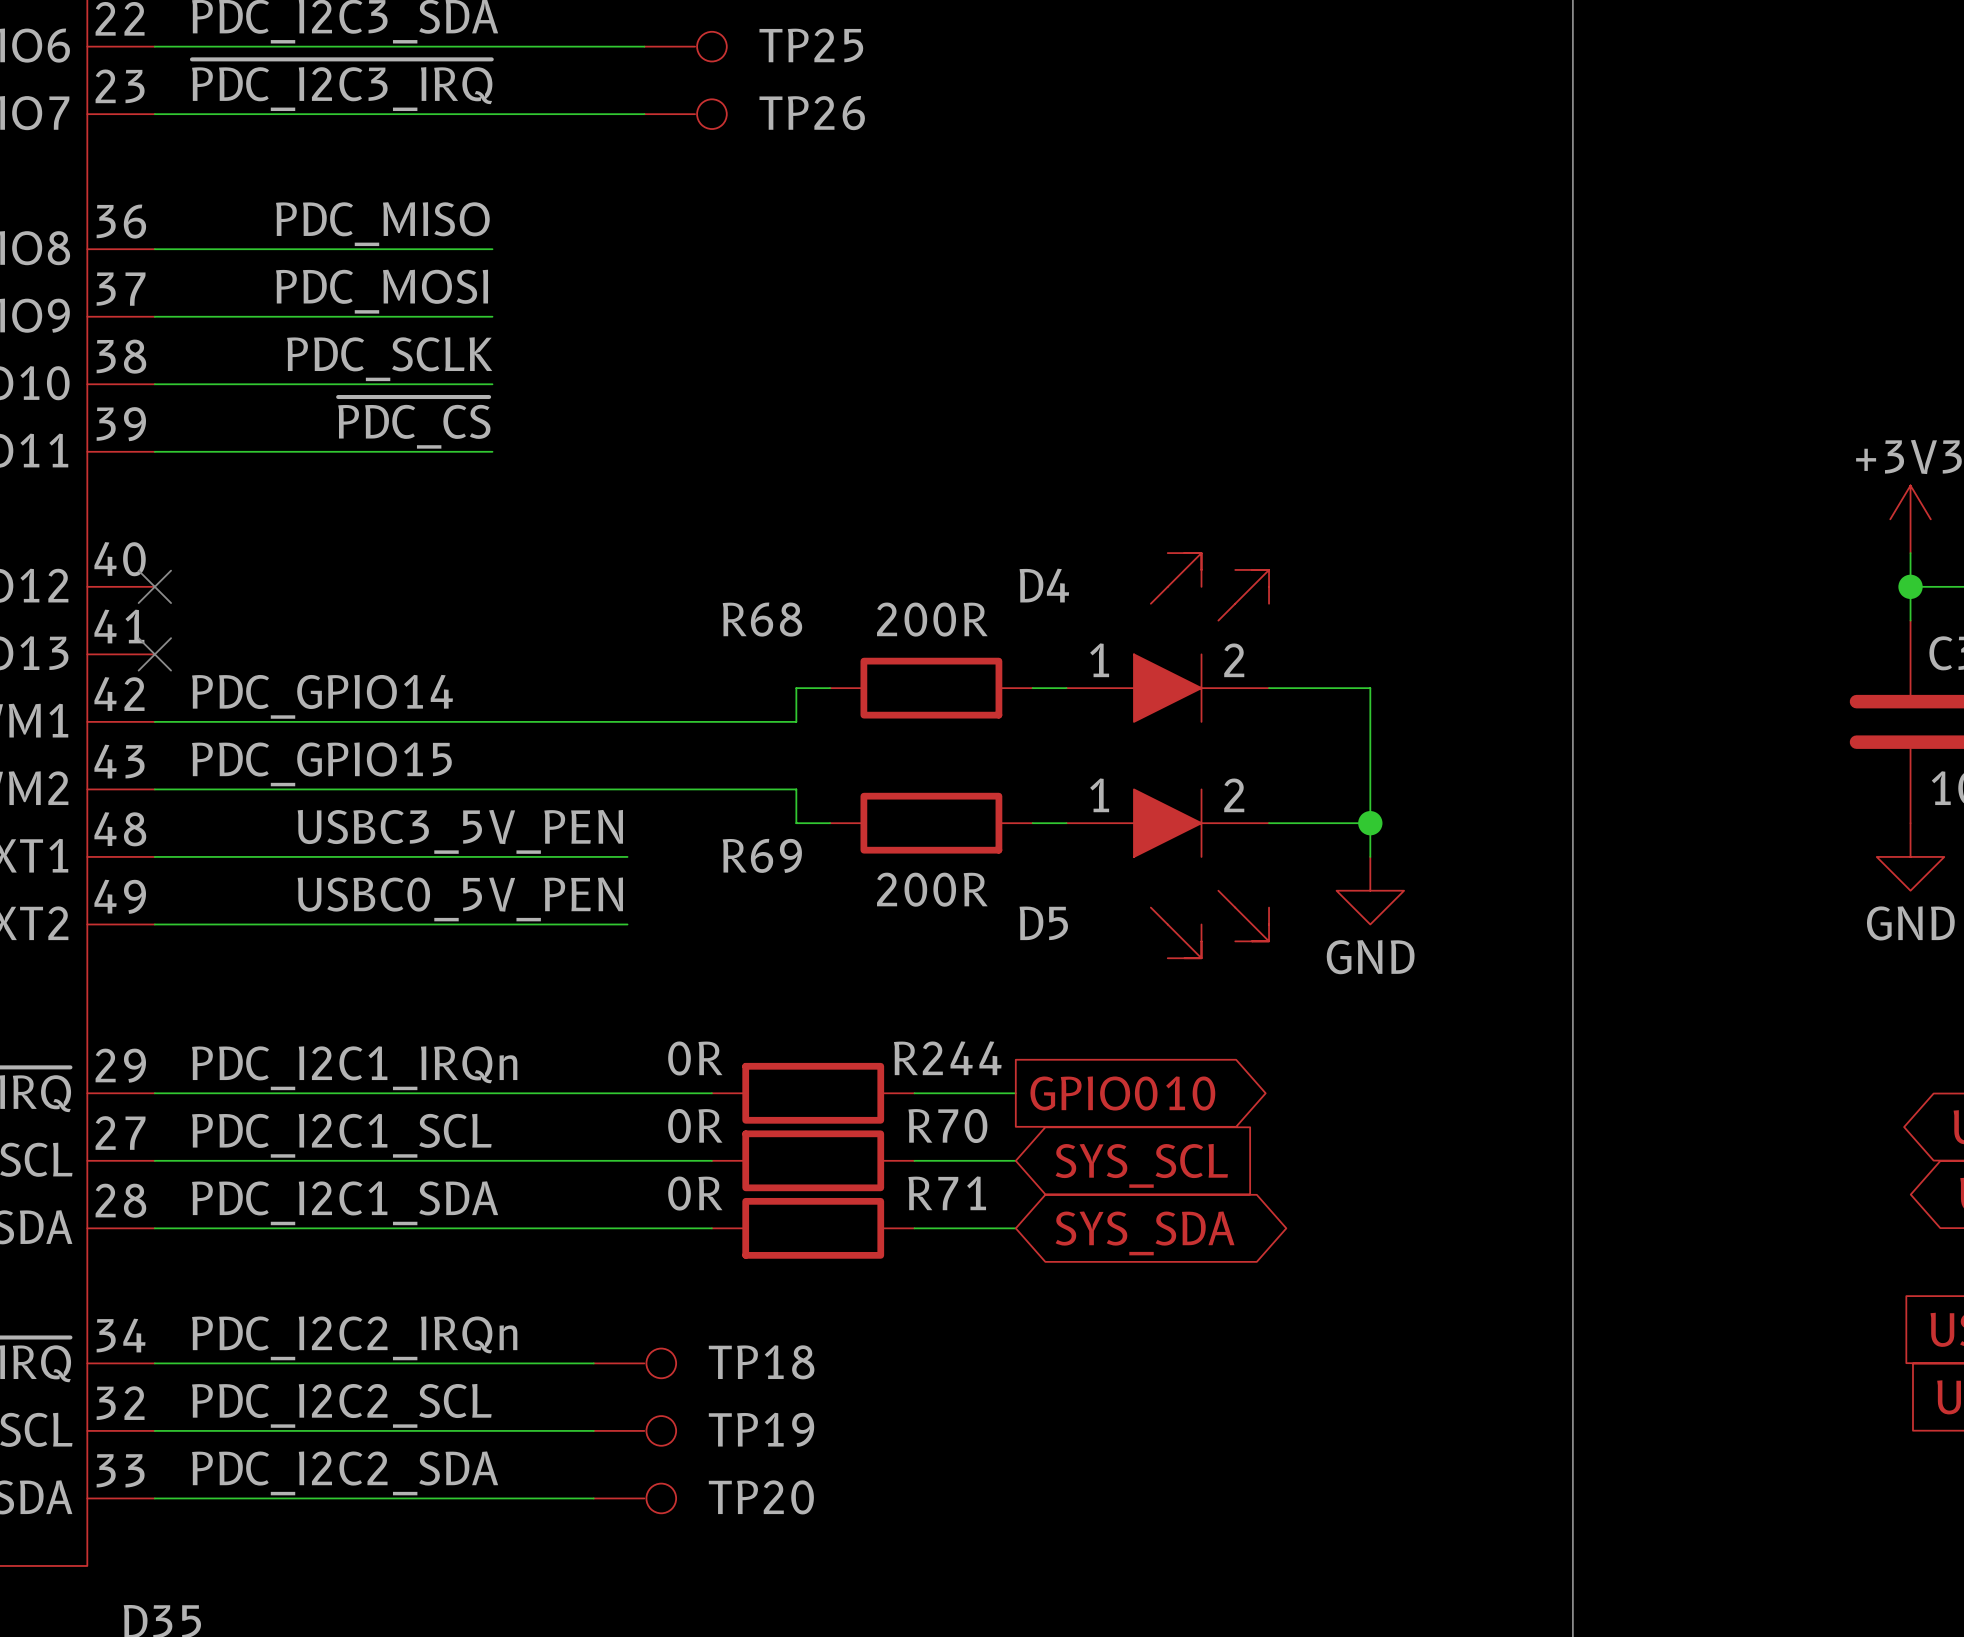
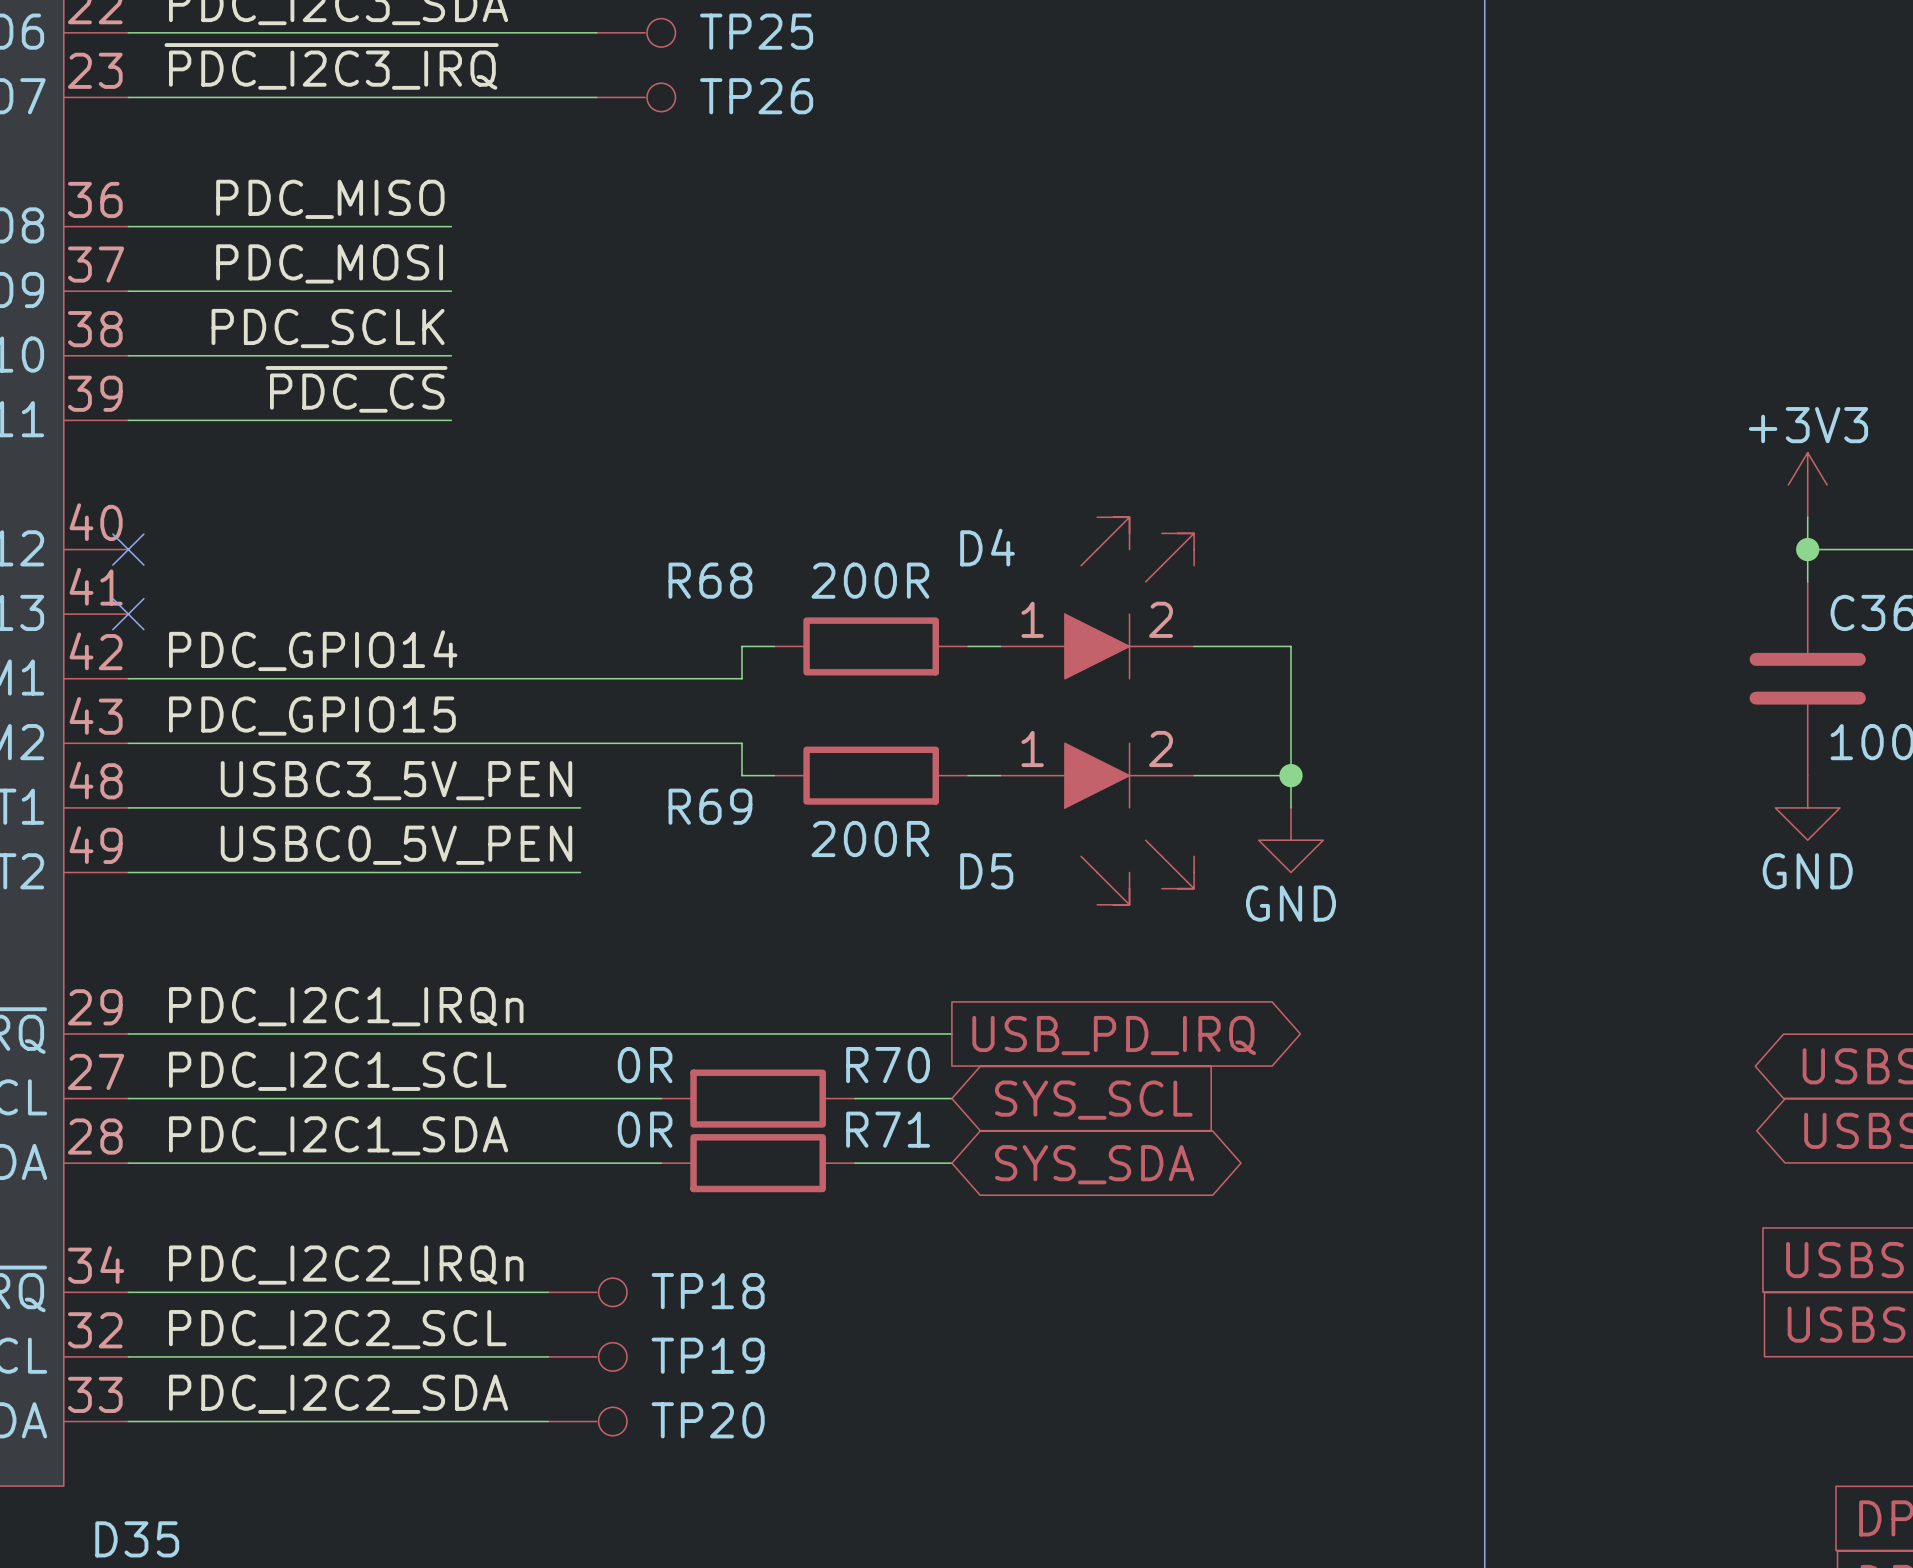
wire: none -> (661, 1033) (855, 1033)
R244: (813, 1093) -> none
global label: GPIO010 (1122, 1093) -> USB_PD_IRQ (1114, 1035)

